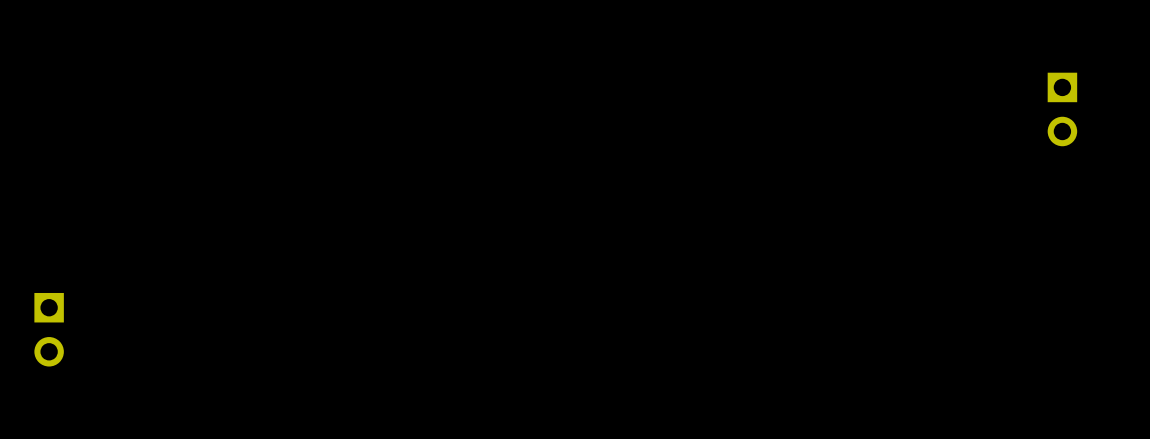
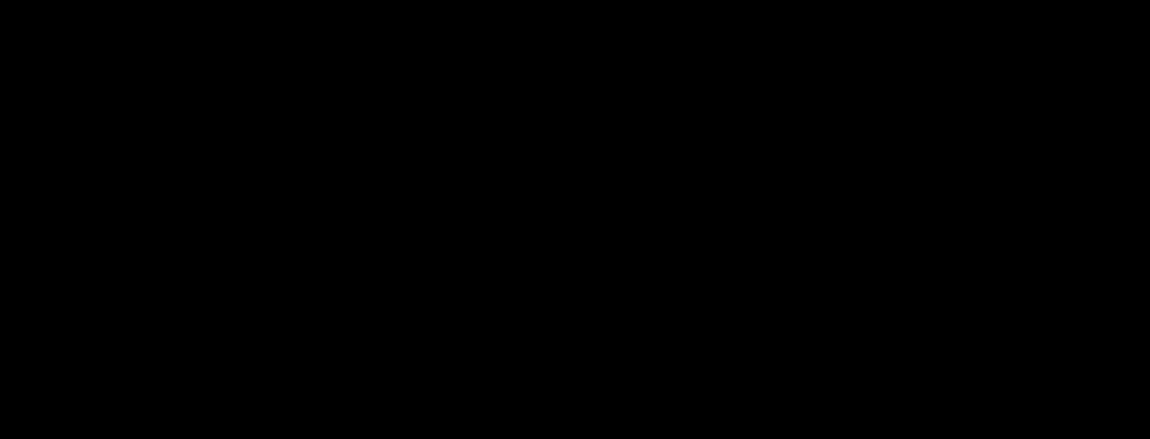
part: (1062, 109) -> none
part: (49, 329) -> none

